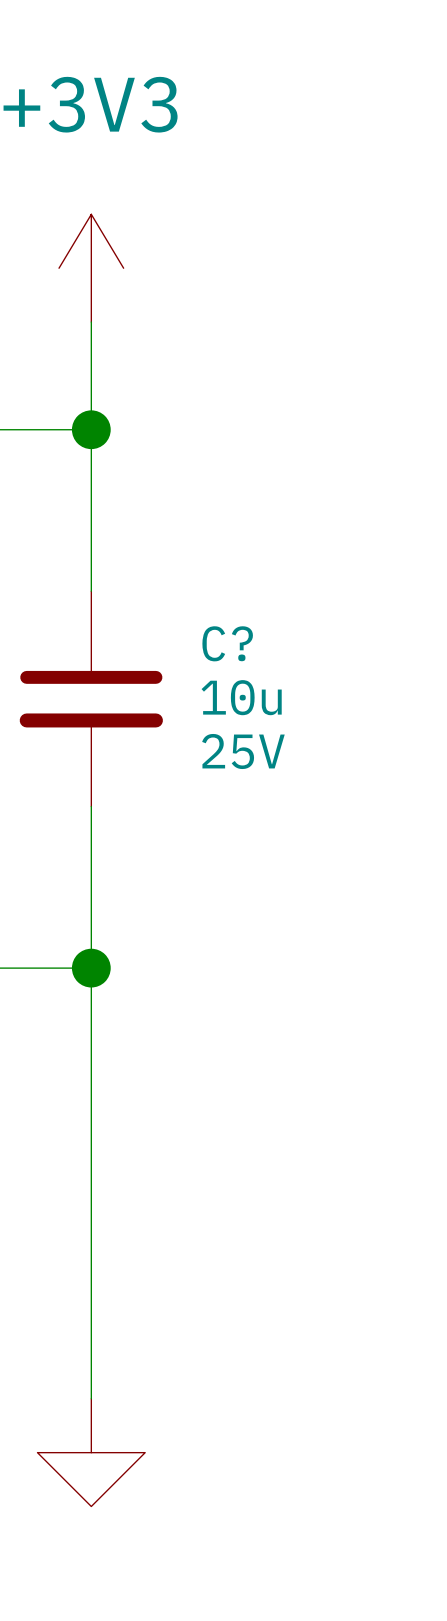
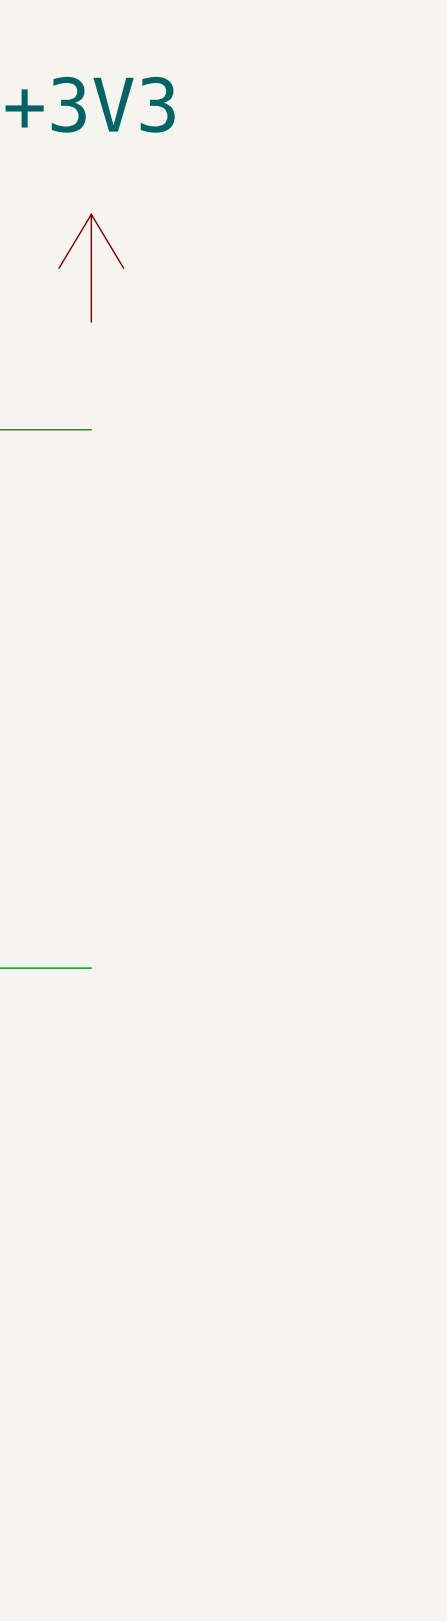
wire: (91, 322) (91, 591) -> none
junction: (91, 429) -> none
C?: 10u (91, 698) -> none
wire: (91, 806) (91, 1398) -> none
junction: (91, 968) -> none
power symbol: (91, 1452) -> none

